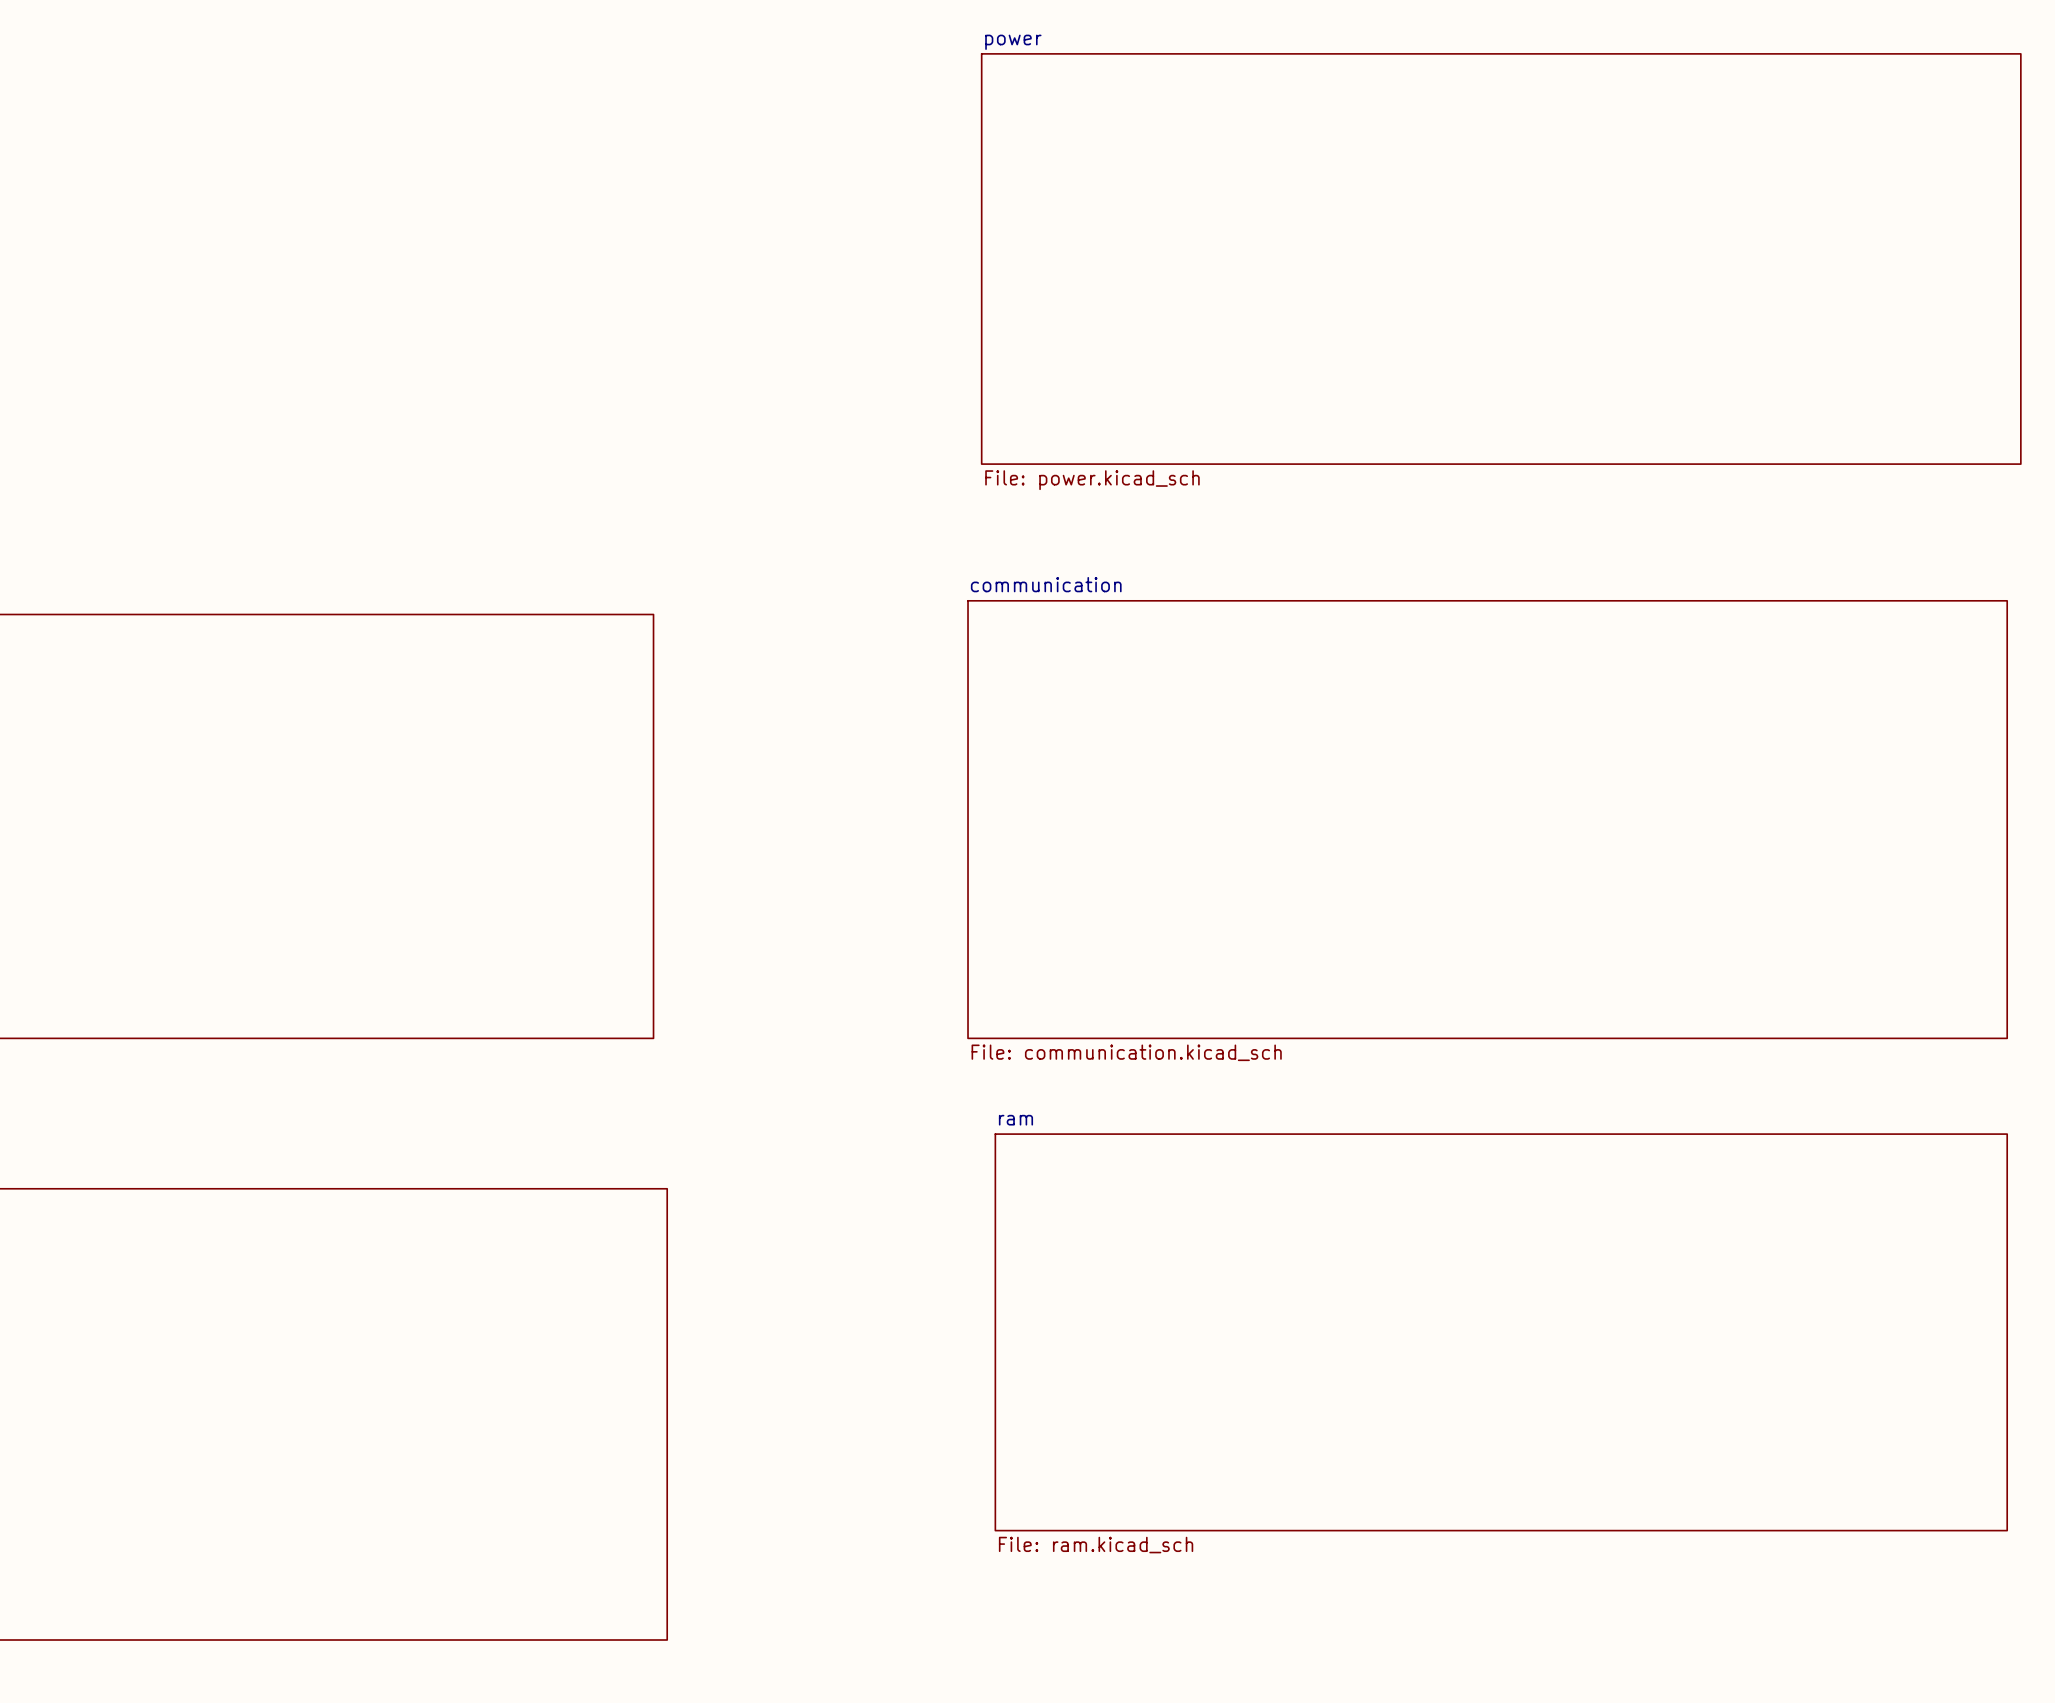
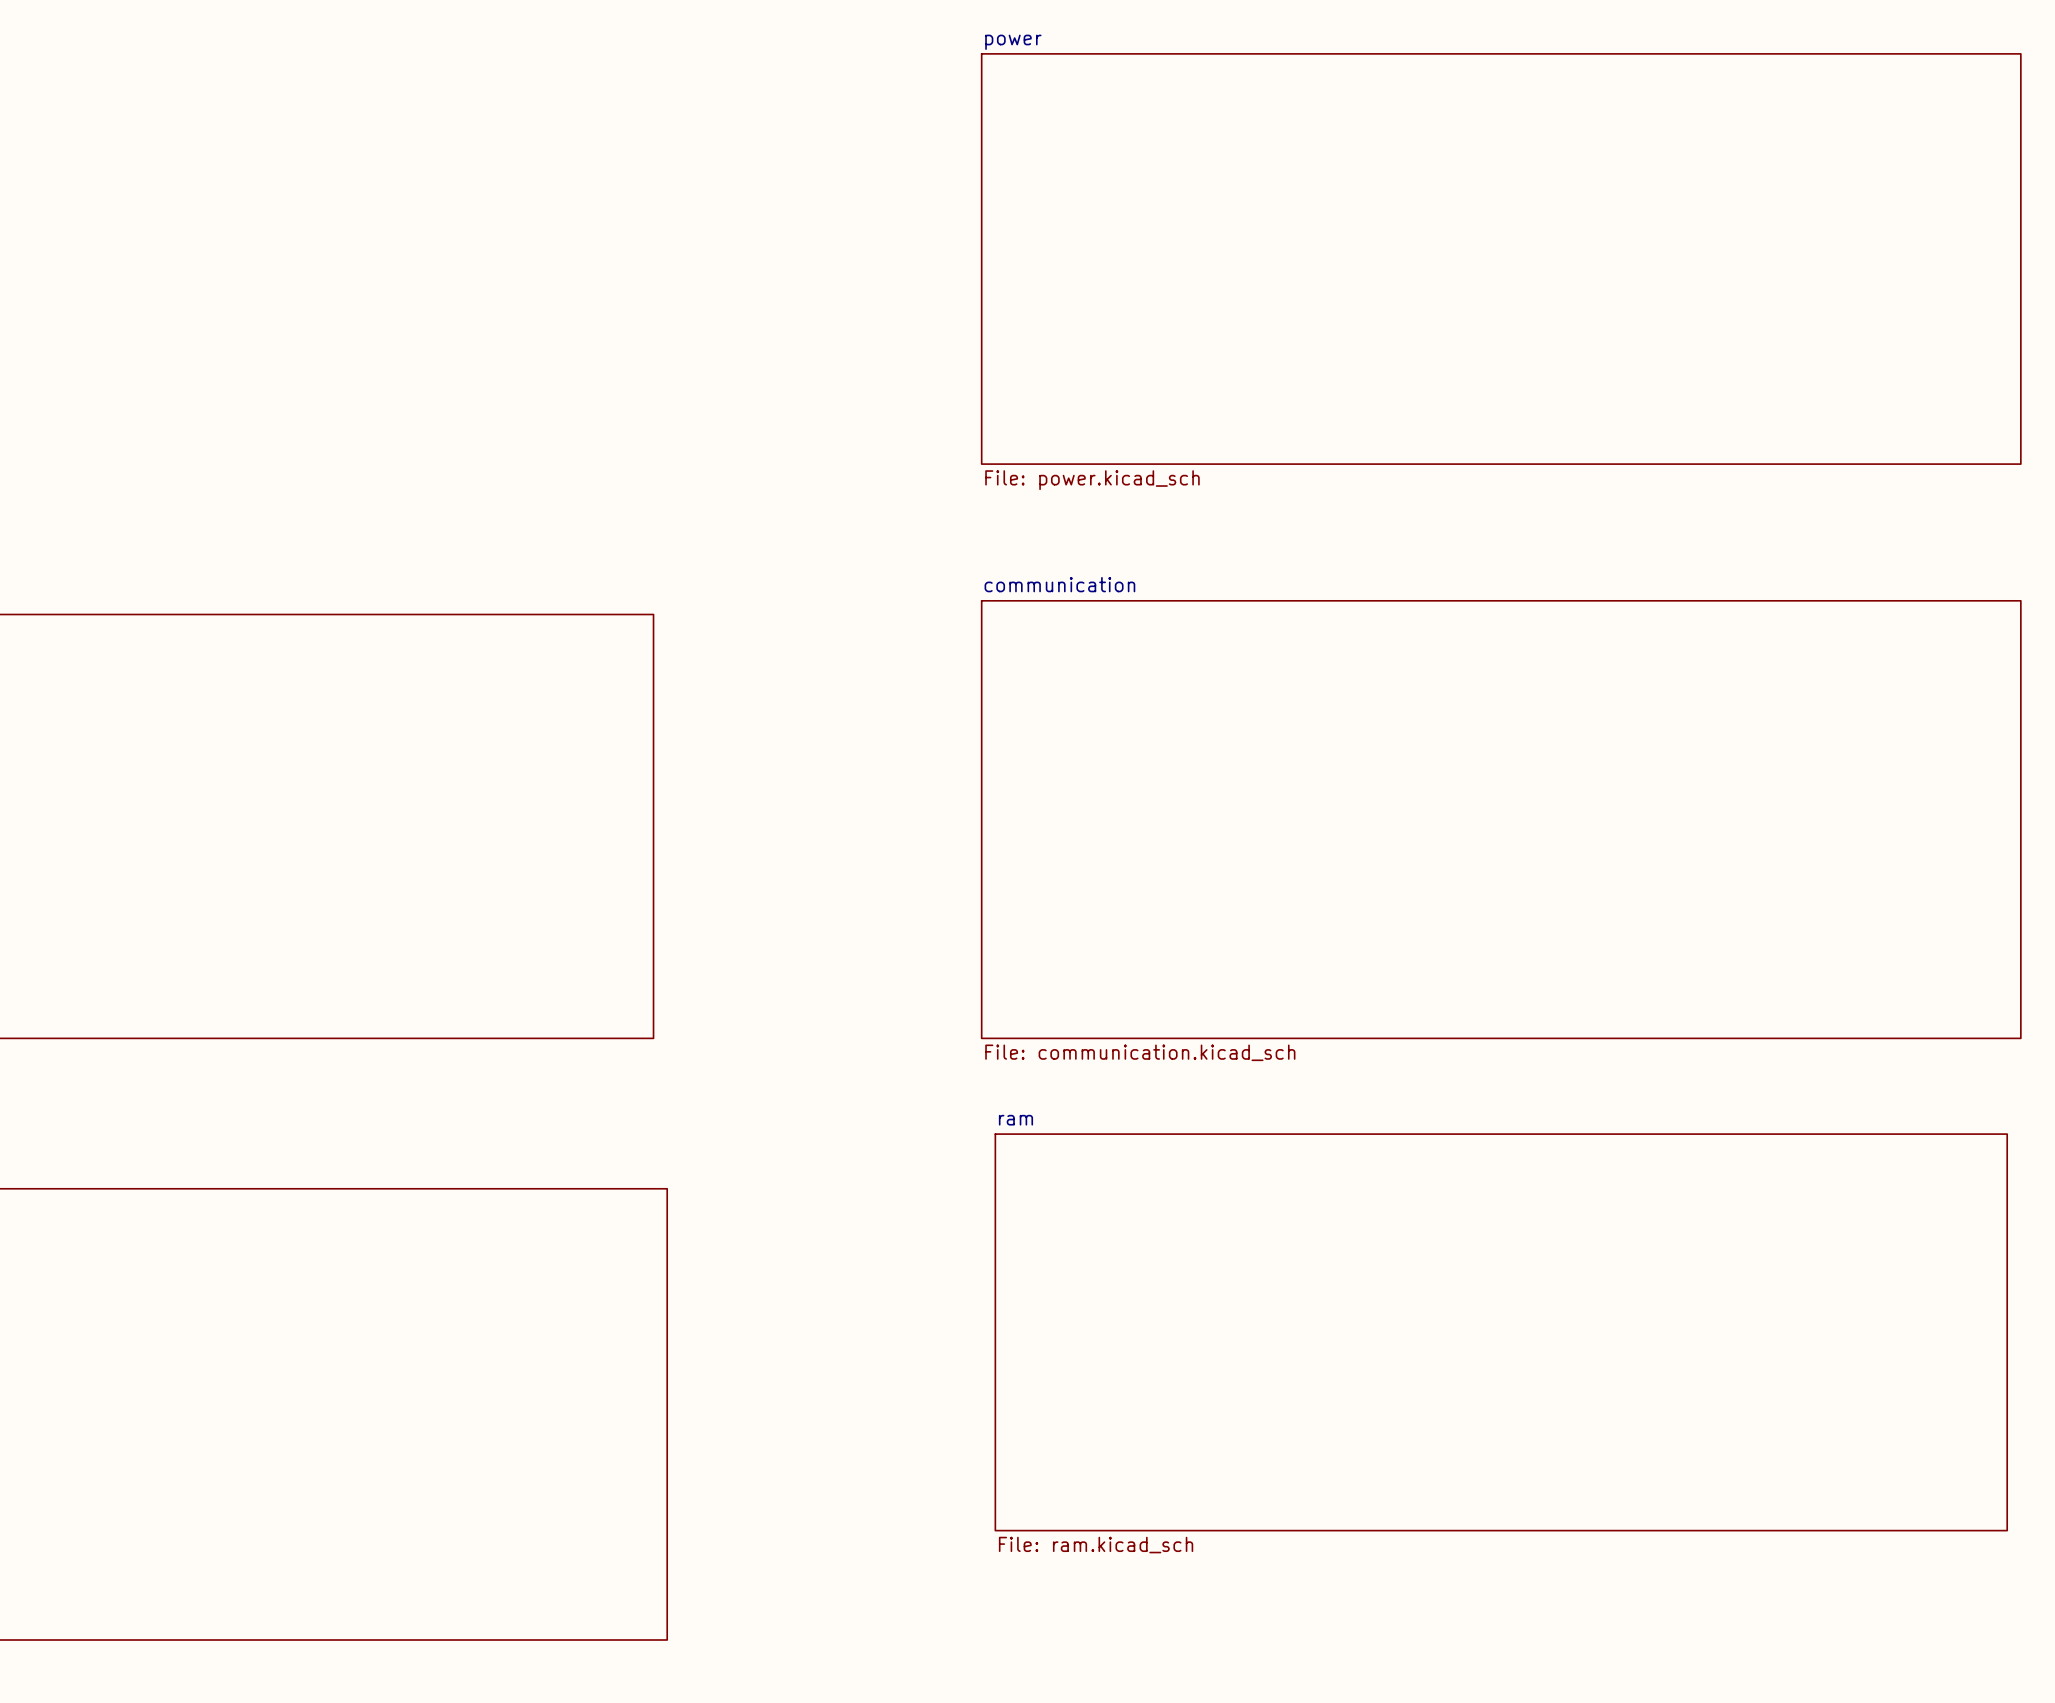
sheet communication position: (1487, 819) -> (1501, 819)

